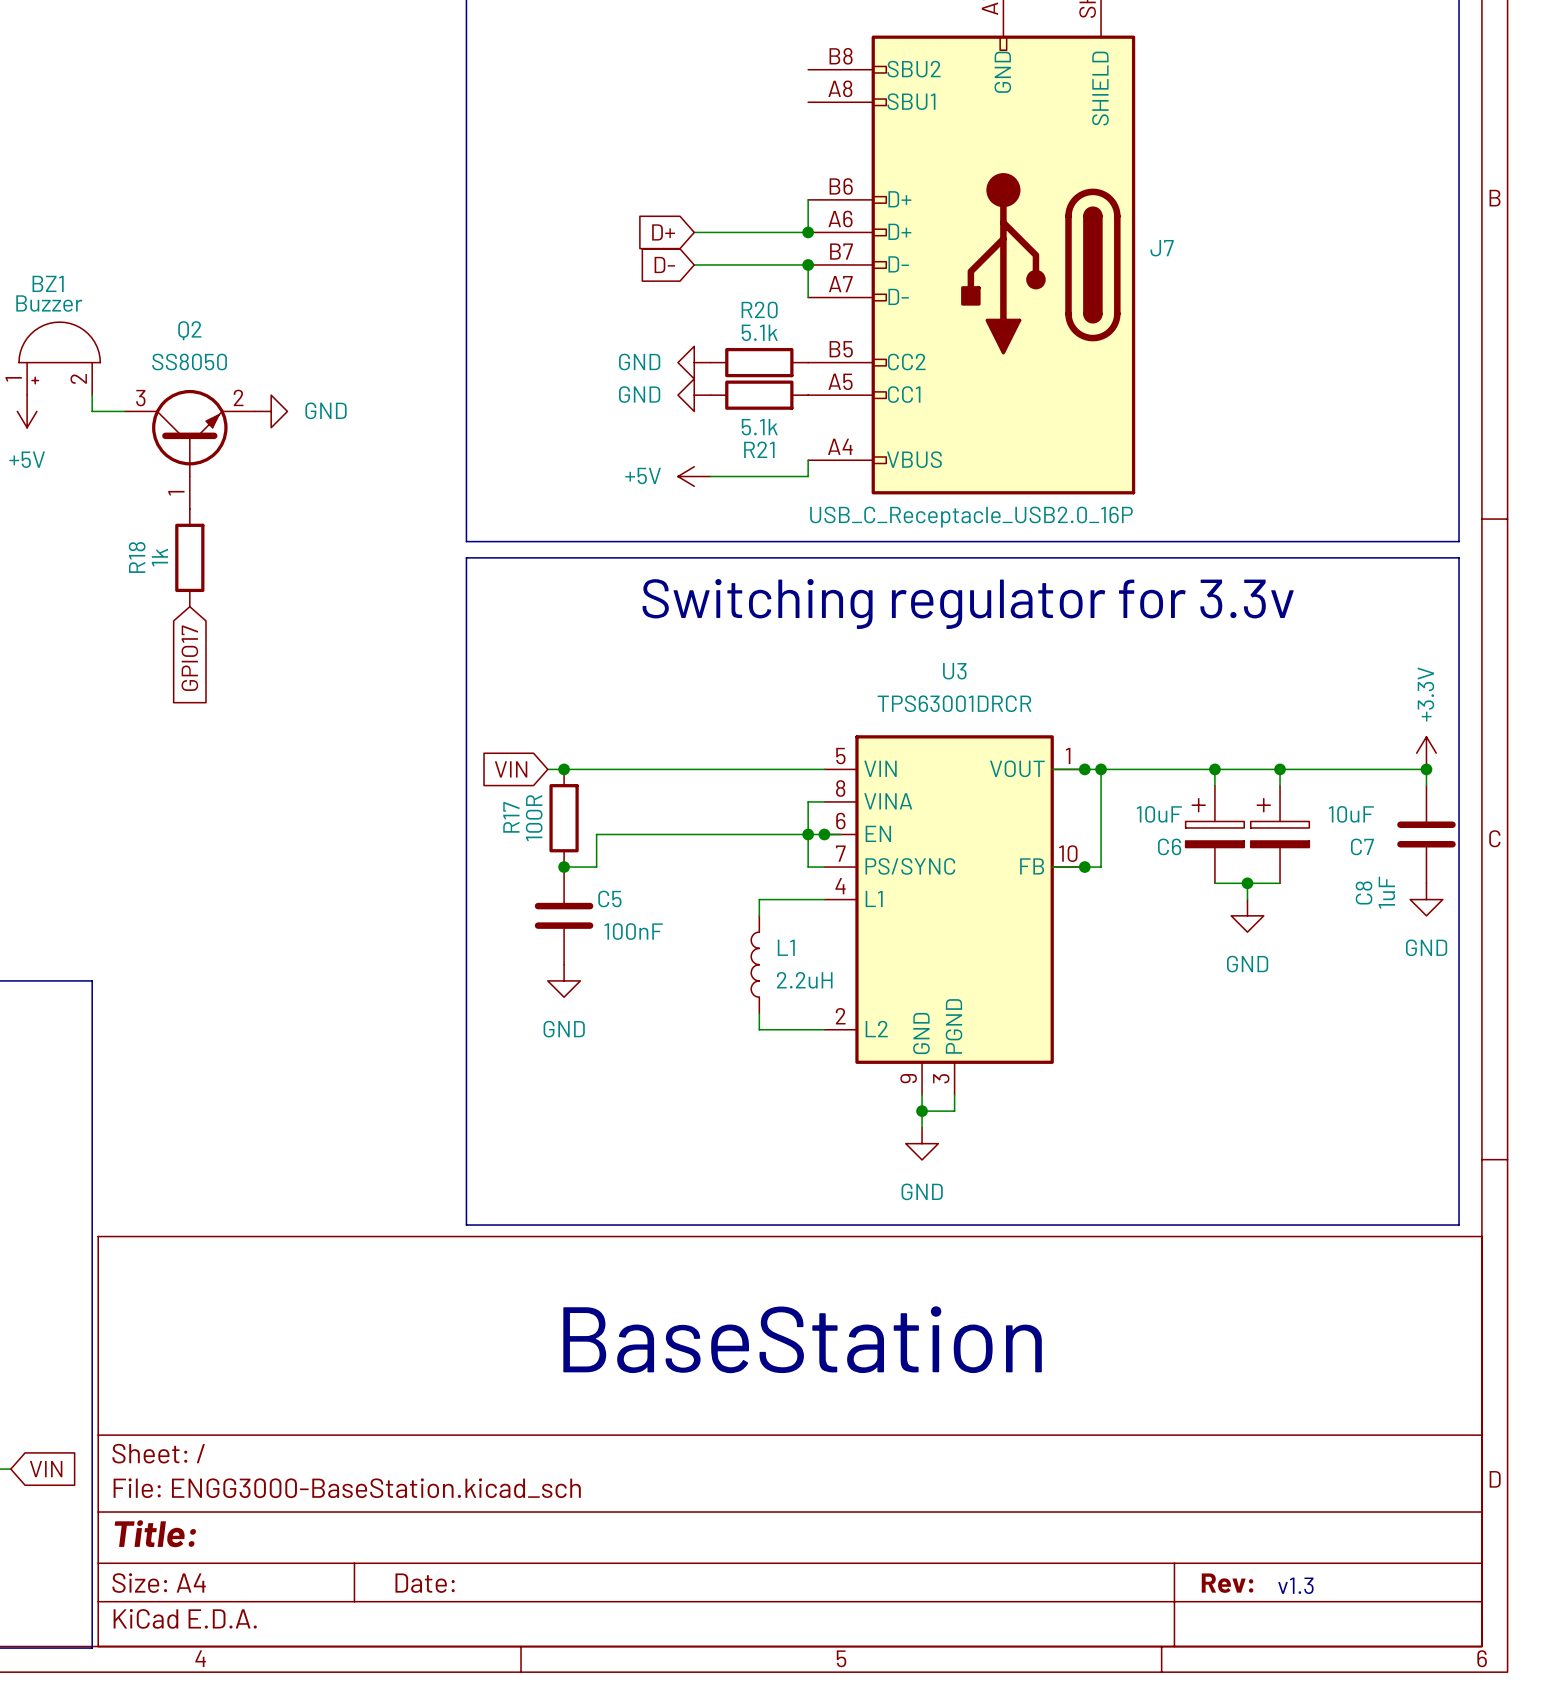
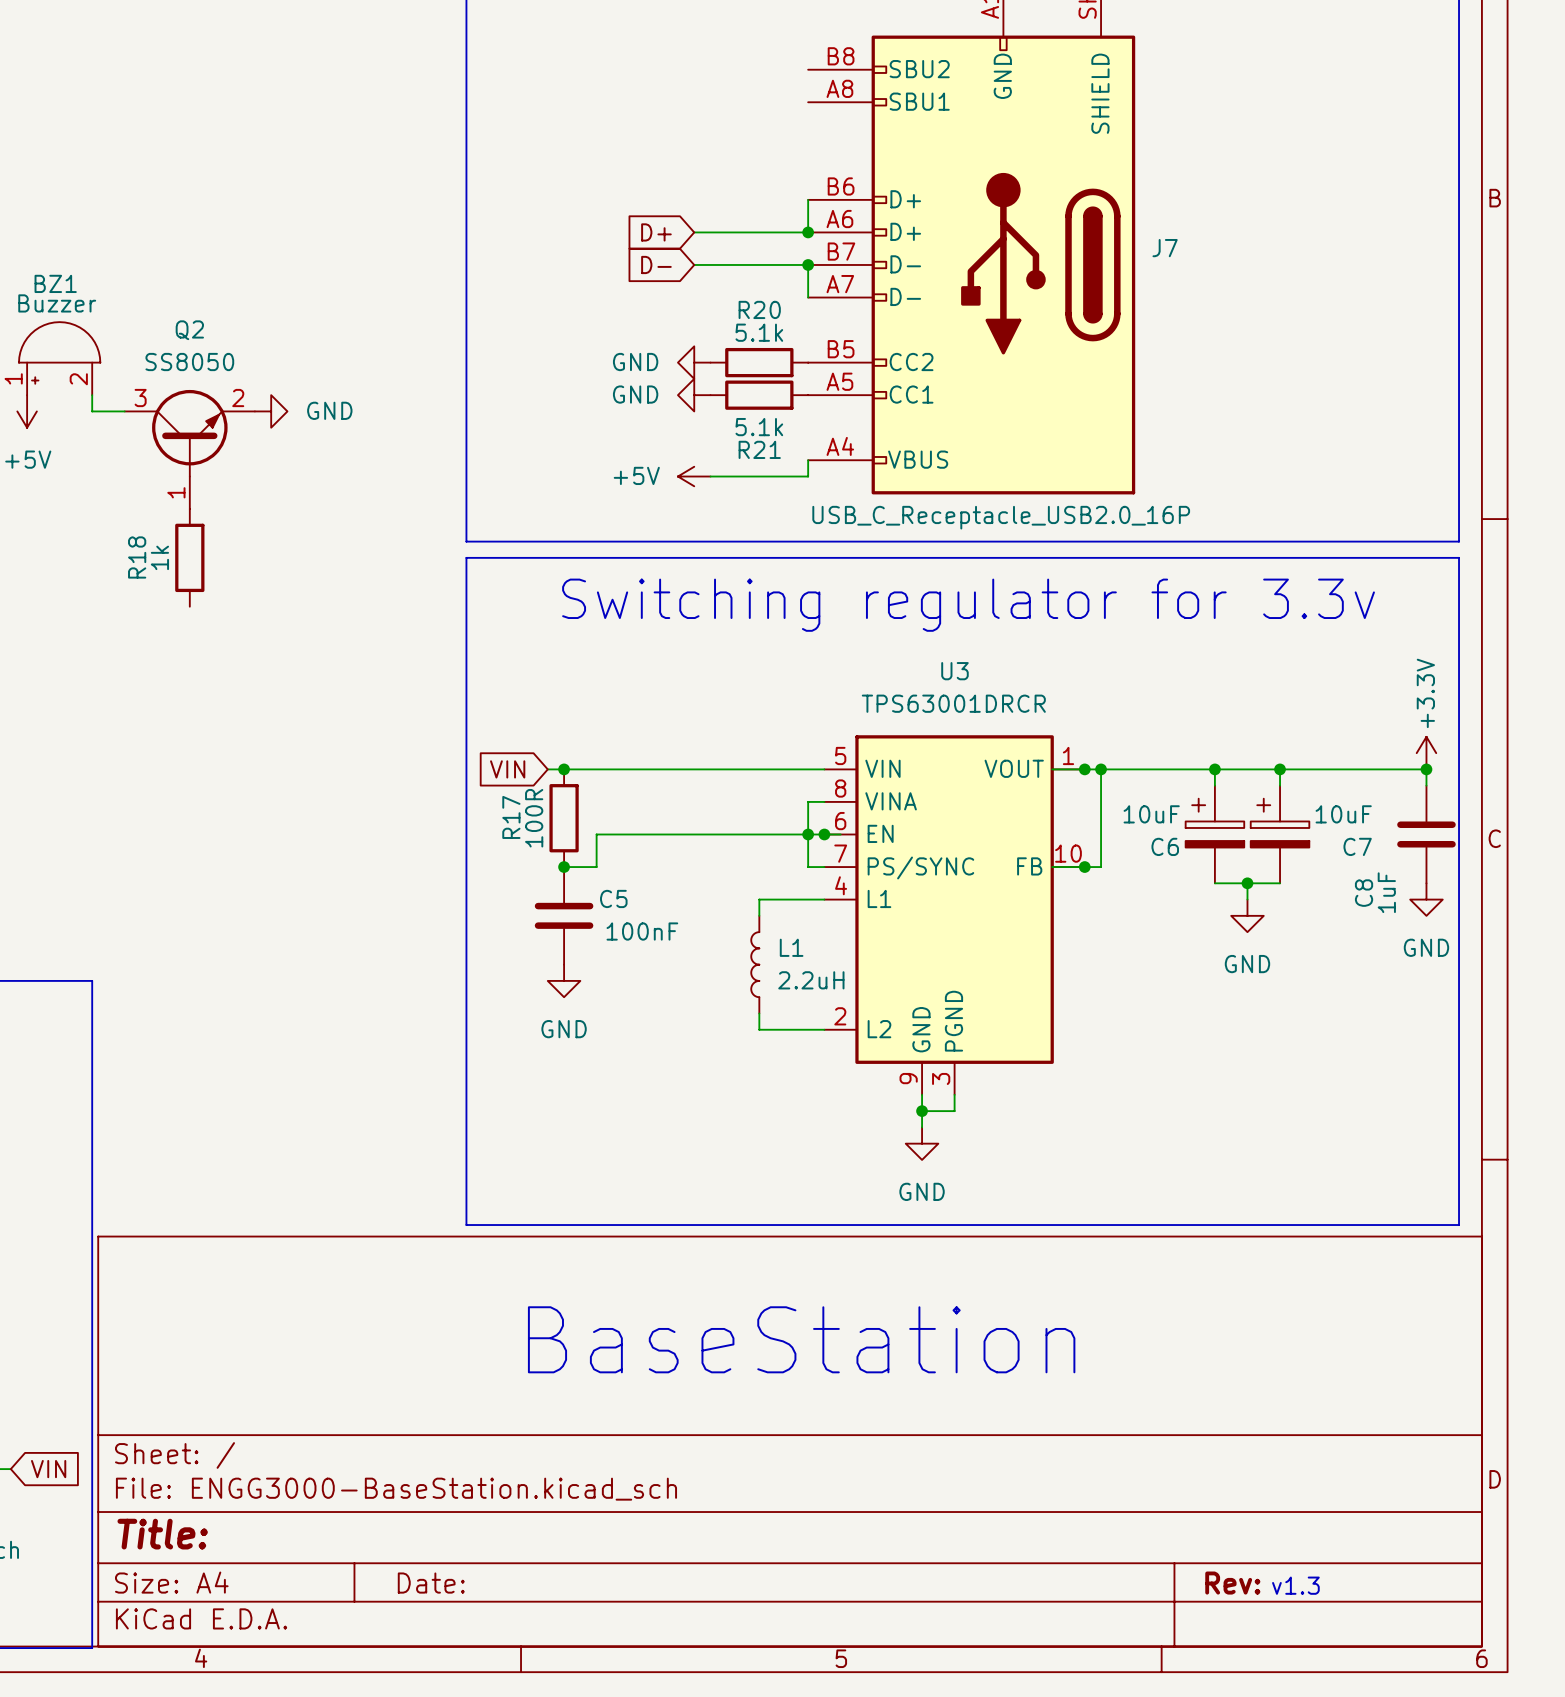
global label: GPIO17 (189, 658) -> none

